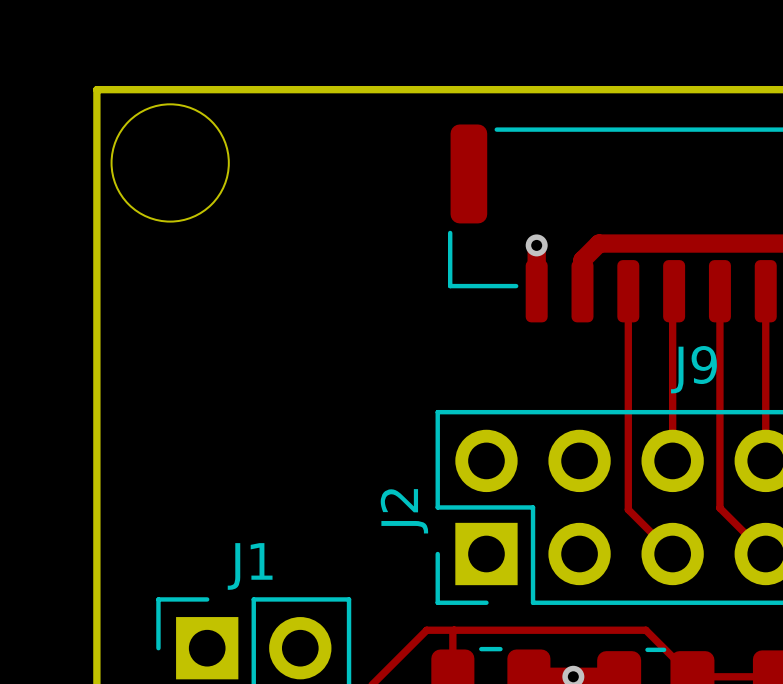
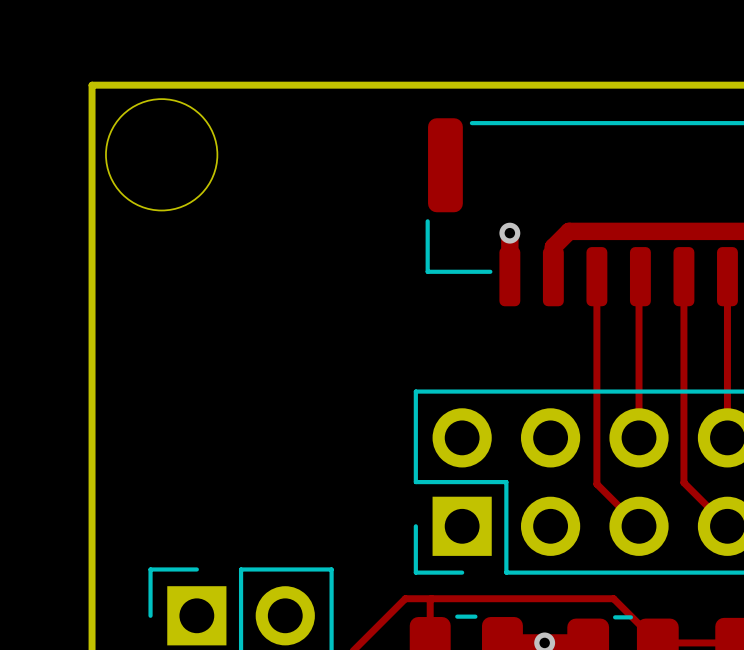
J9 name: J9 (693, 369) -> none
J2 name: J2 (404, 511) -> none
J1 name: J1 (250, 566) -> none

